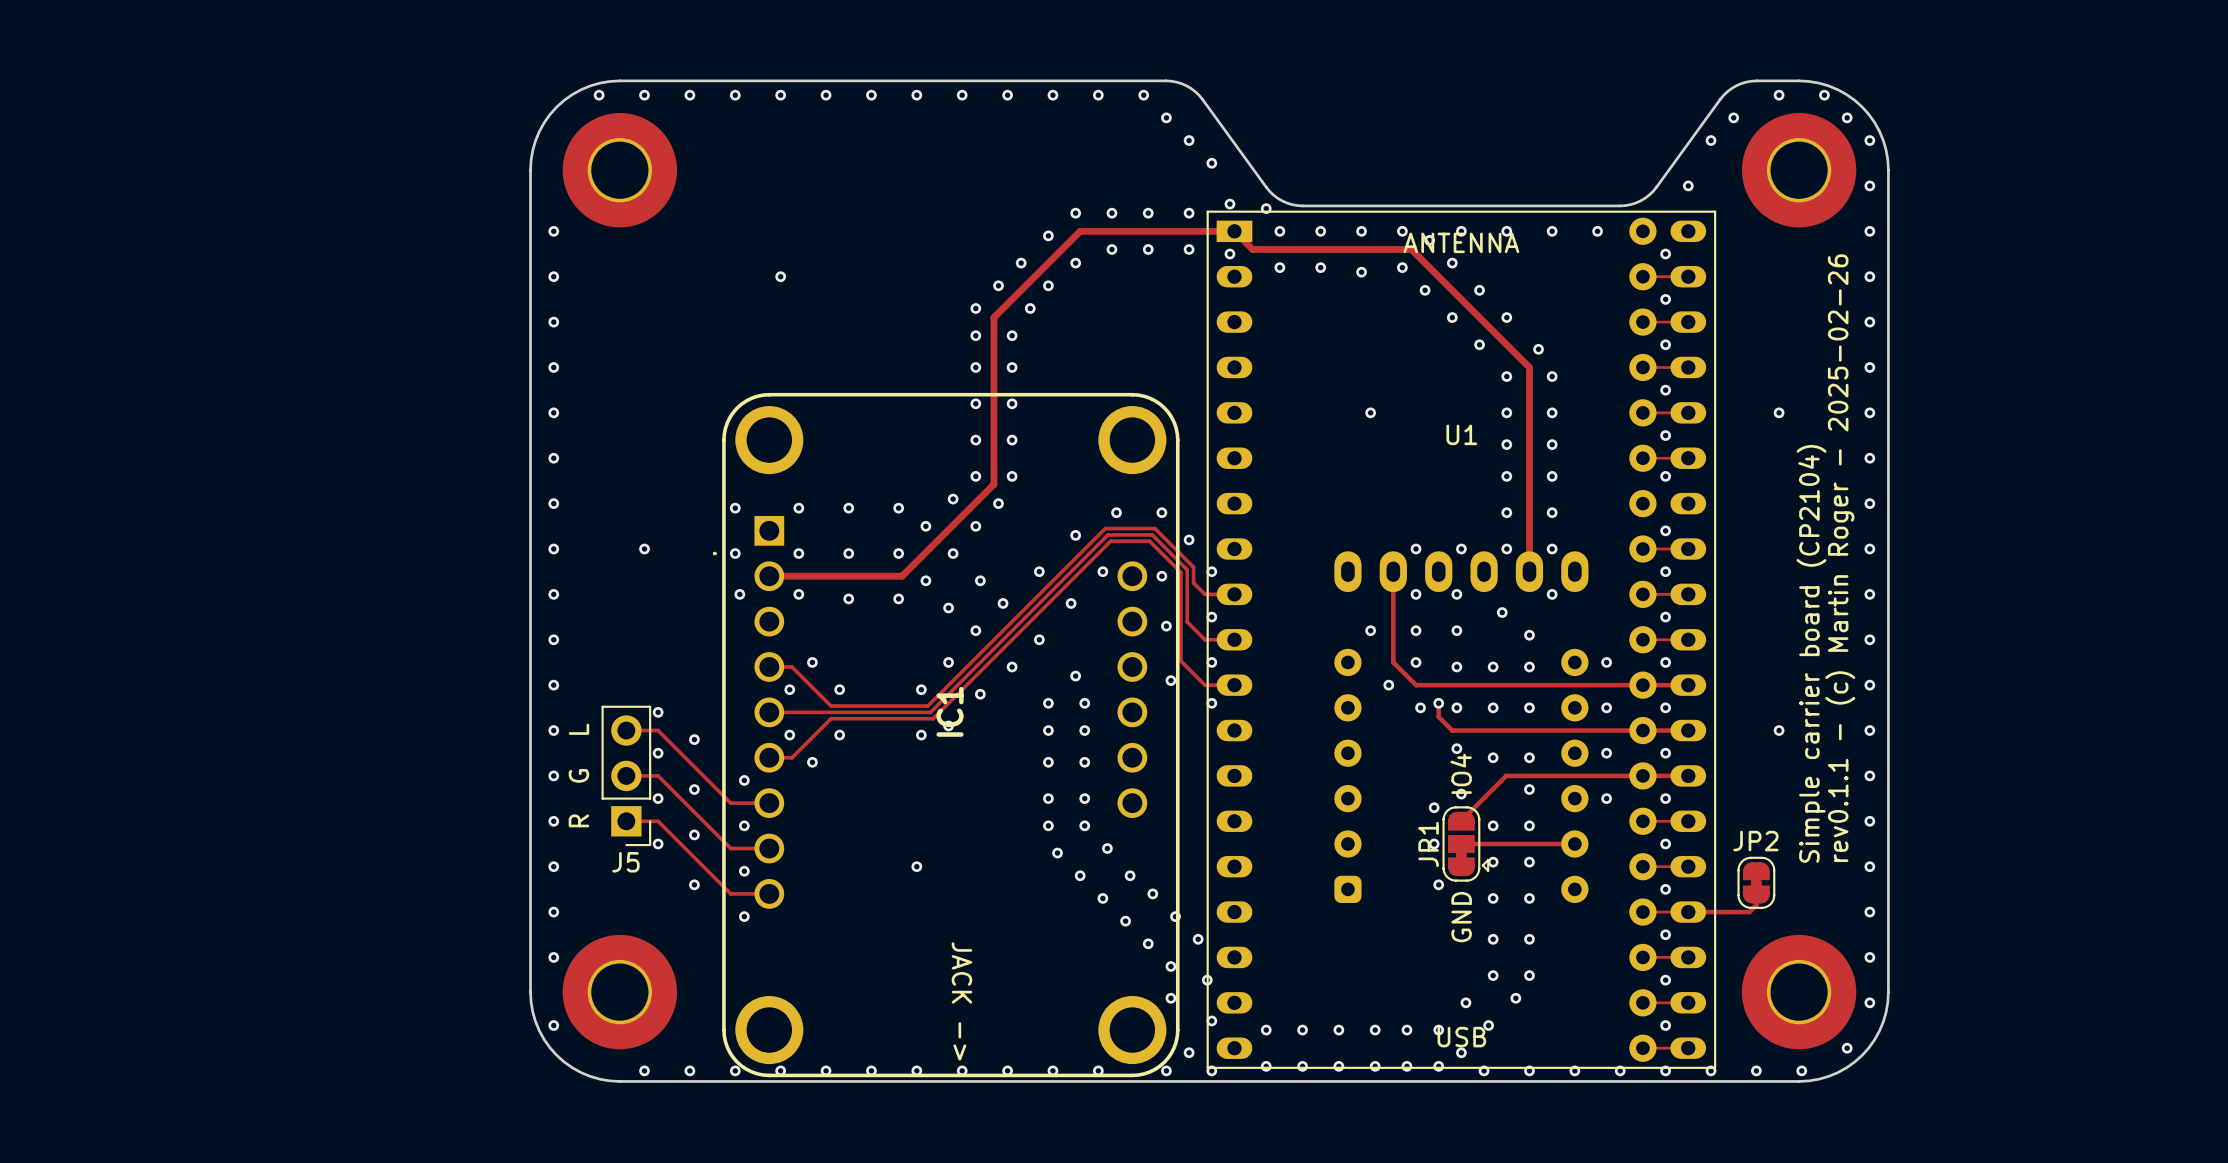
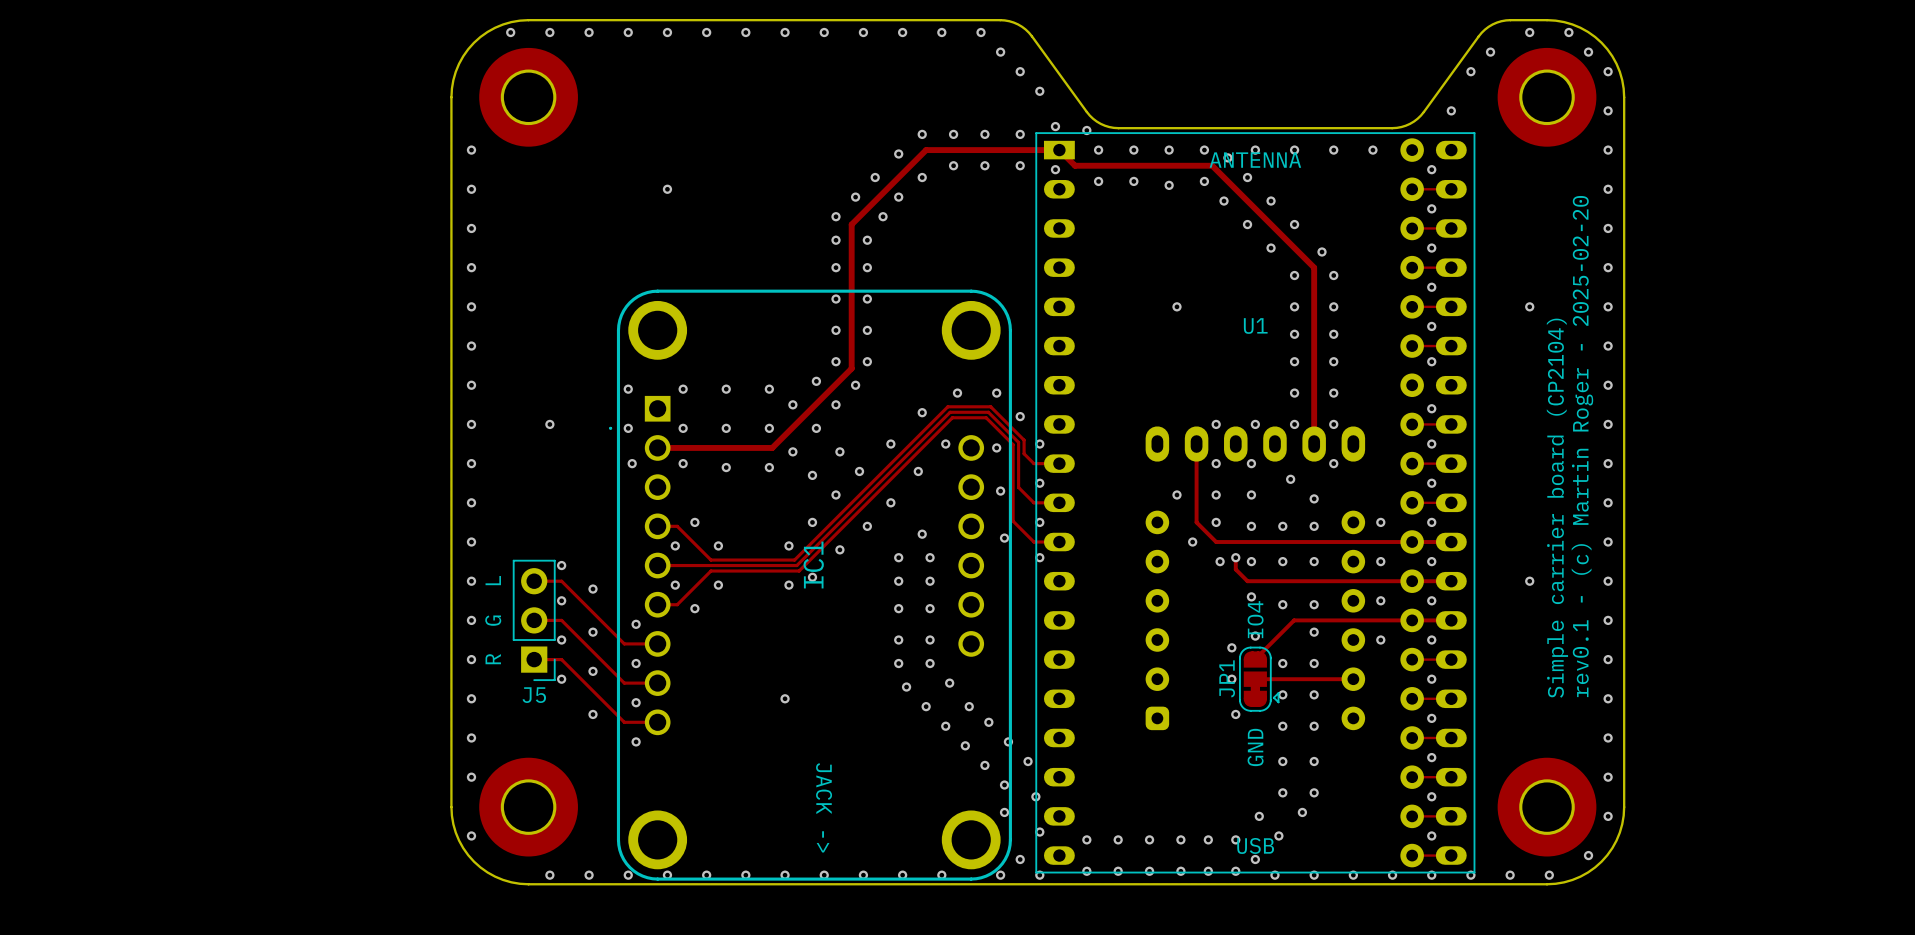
text: rev0.1.1 - (c) Martin Roger - 2025-02-26 (1840, 558) -> rev0.1 - (c) Martin Roger - 2025-02-20 (1582, 446)
JP2: (1756, 882) -> none
track: (1756, 894) (1756, 905) (1749, 912) (1688, 912) -> none

